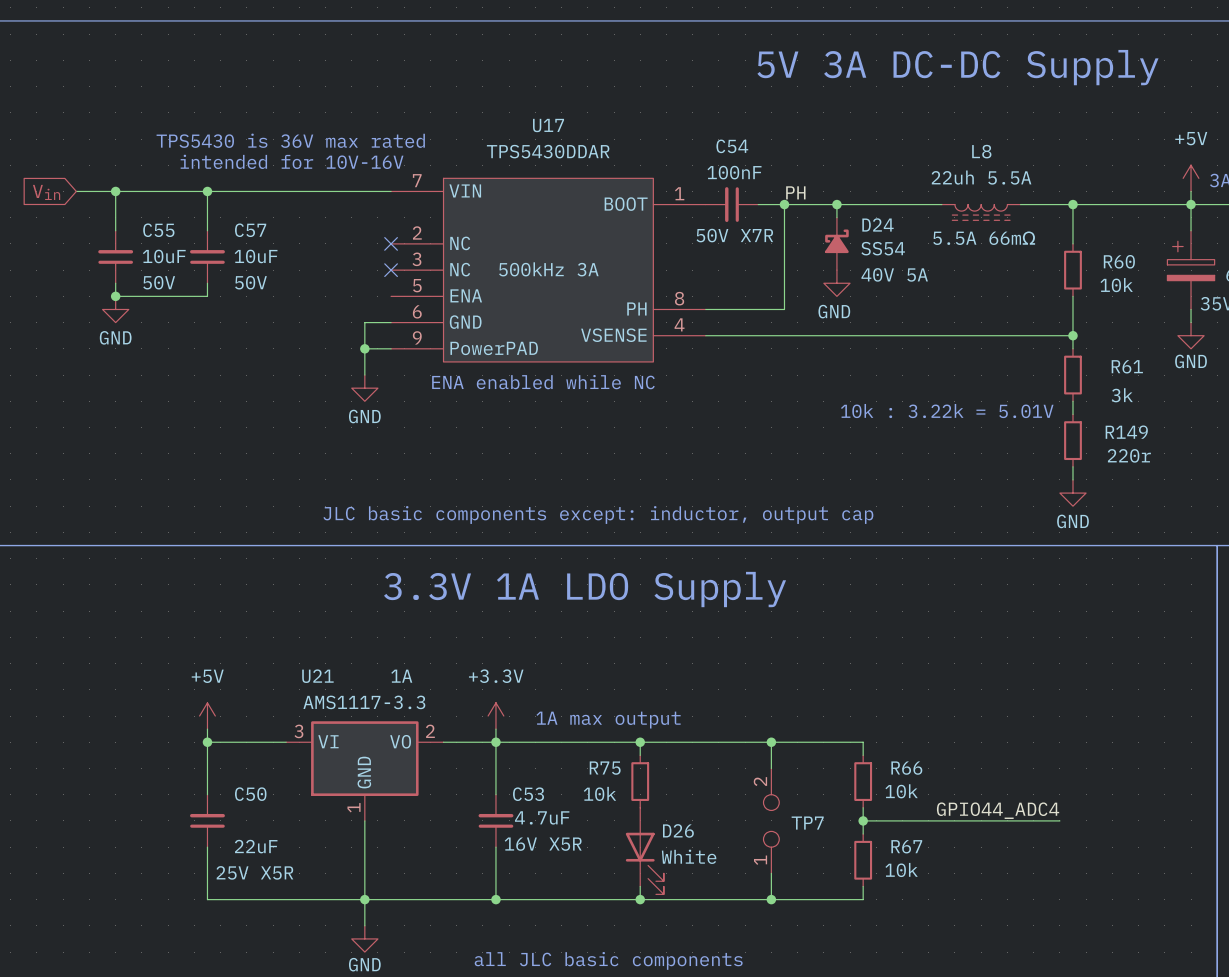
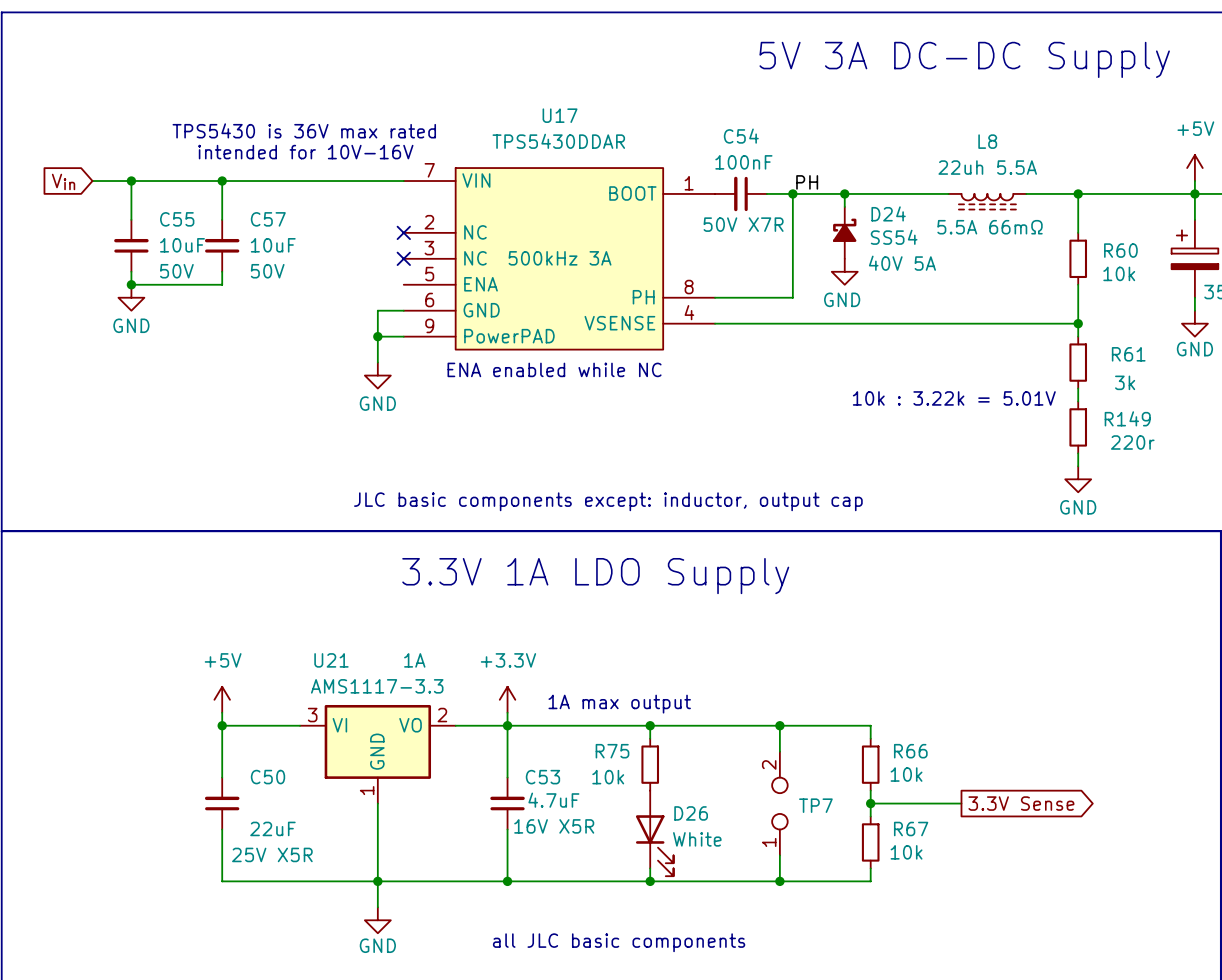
label: GPIO44_ADC4 (998, 810) -> none
wire: (954, 820) (1059, 820) -> none
global label: none -> 3.3V Sense (1021, 803)

